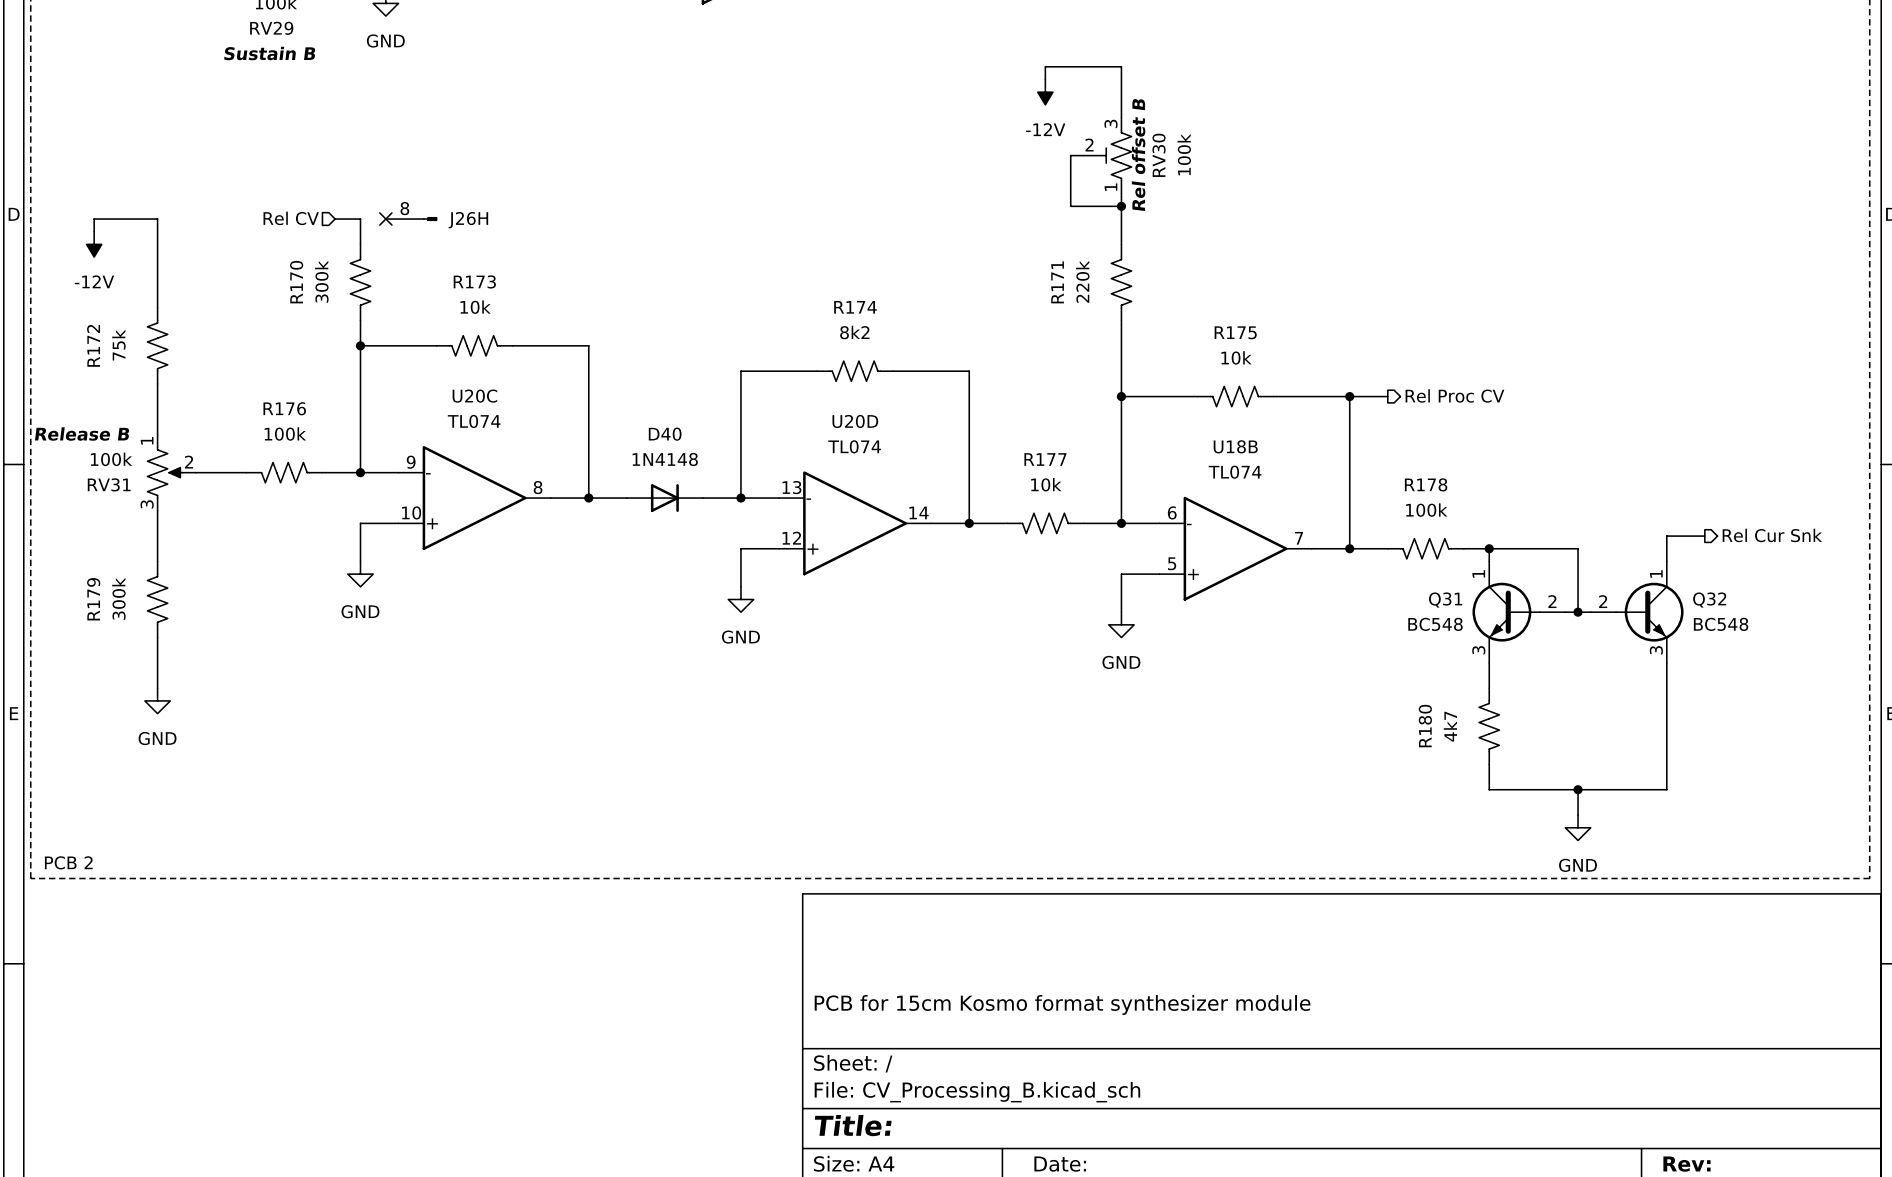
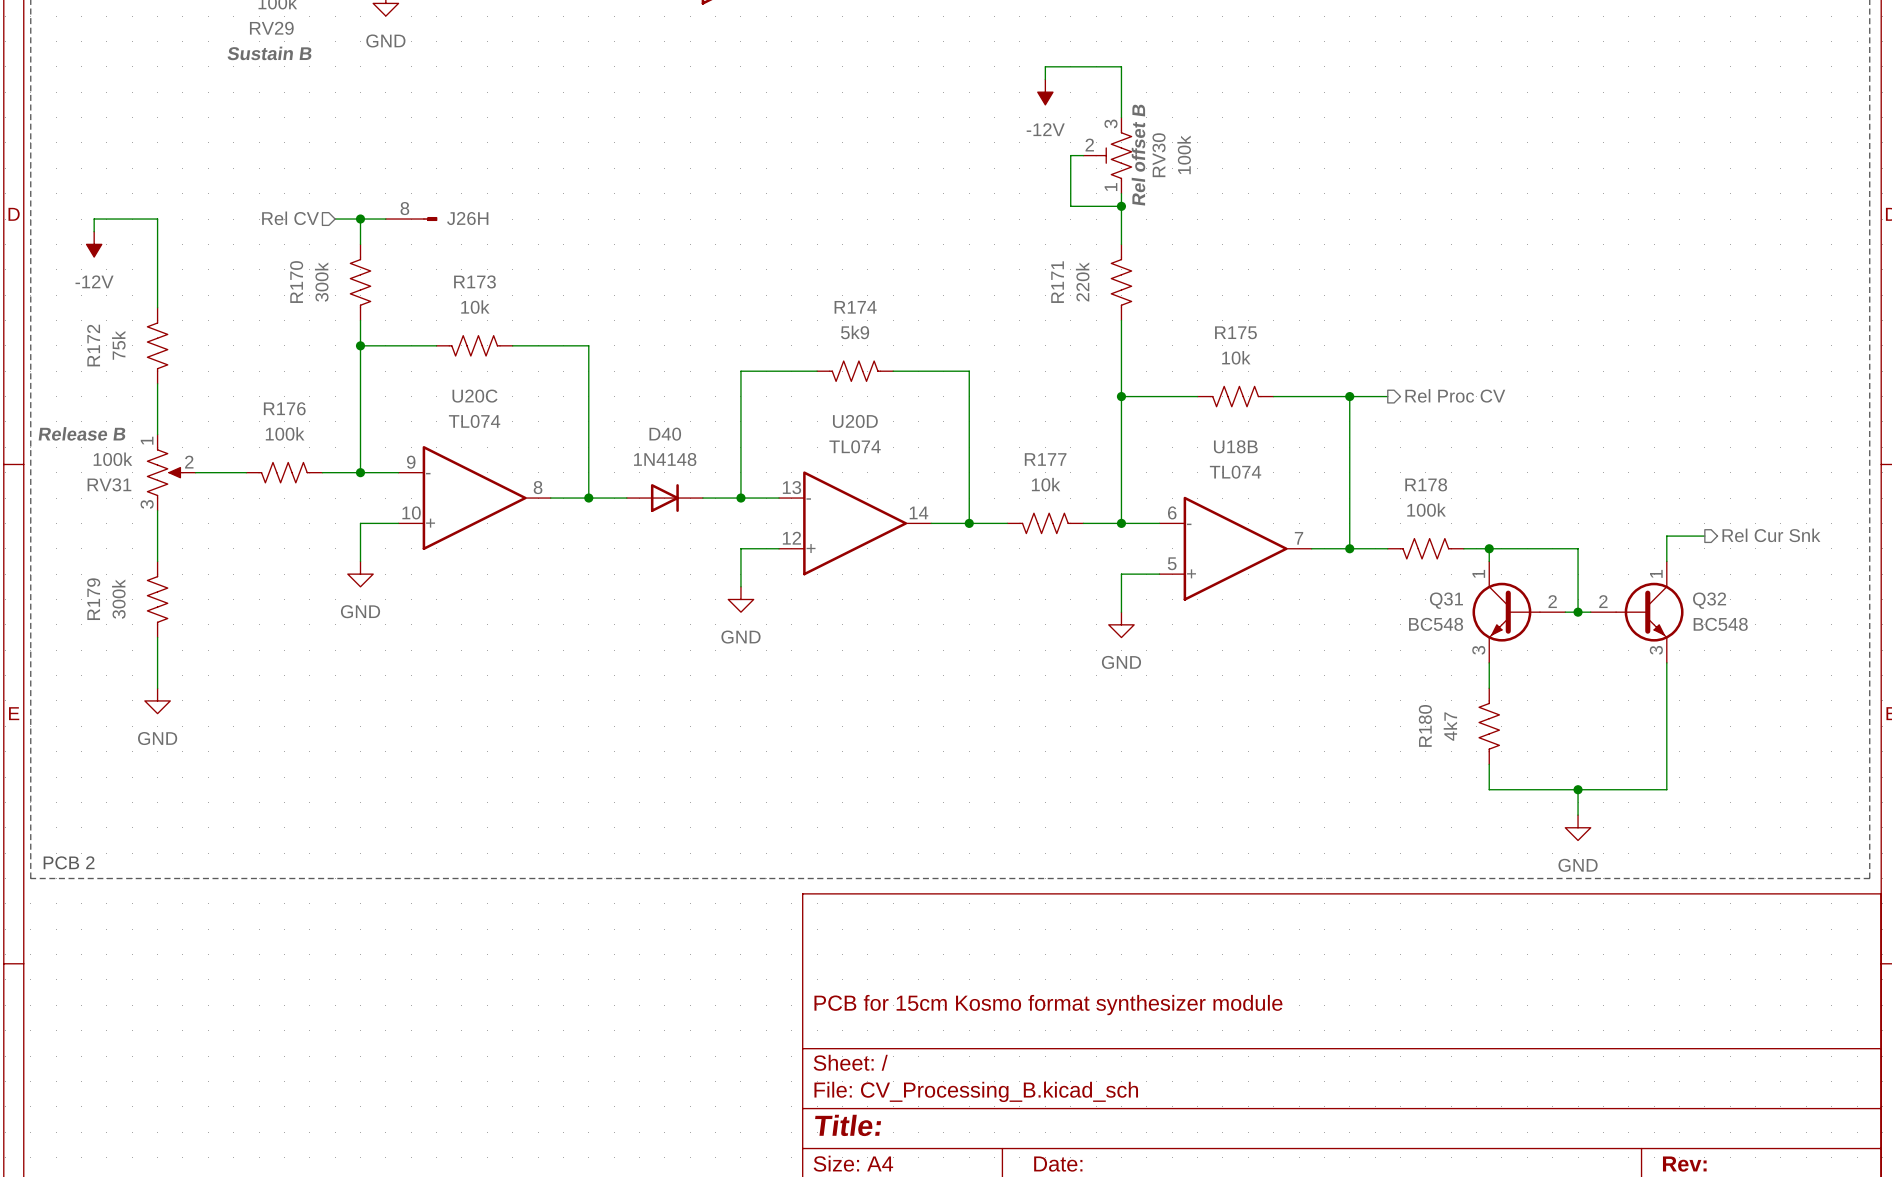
wire: none -> (360, 219) (385, 219)
junction: none -> (360, 219)
no-connect mark: (385, 219) -> none
R174 value: 8k2 (854, 332) -> 5k9 (855, 332)

